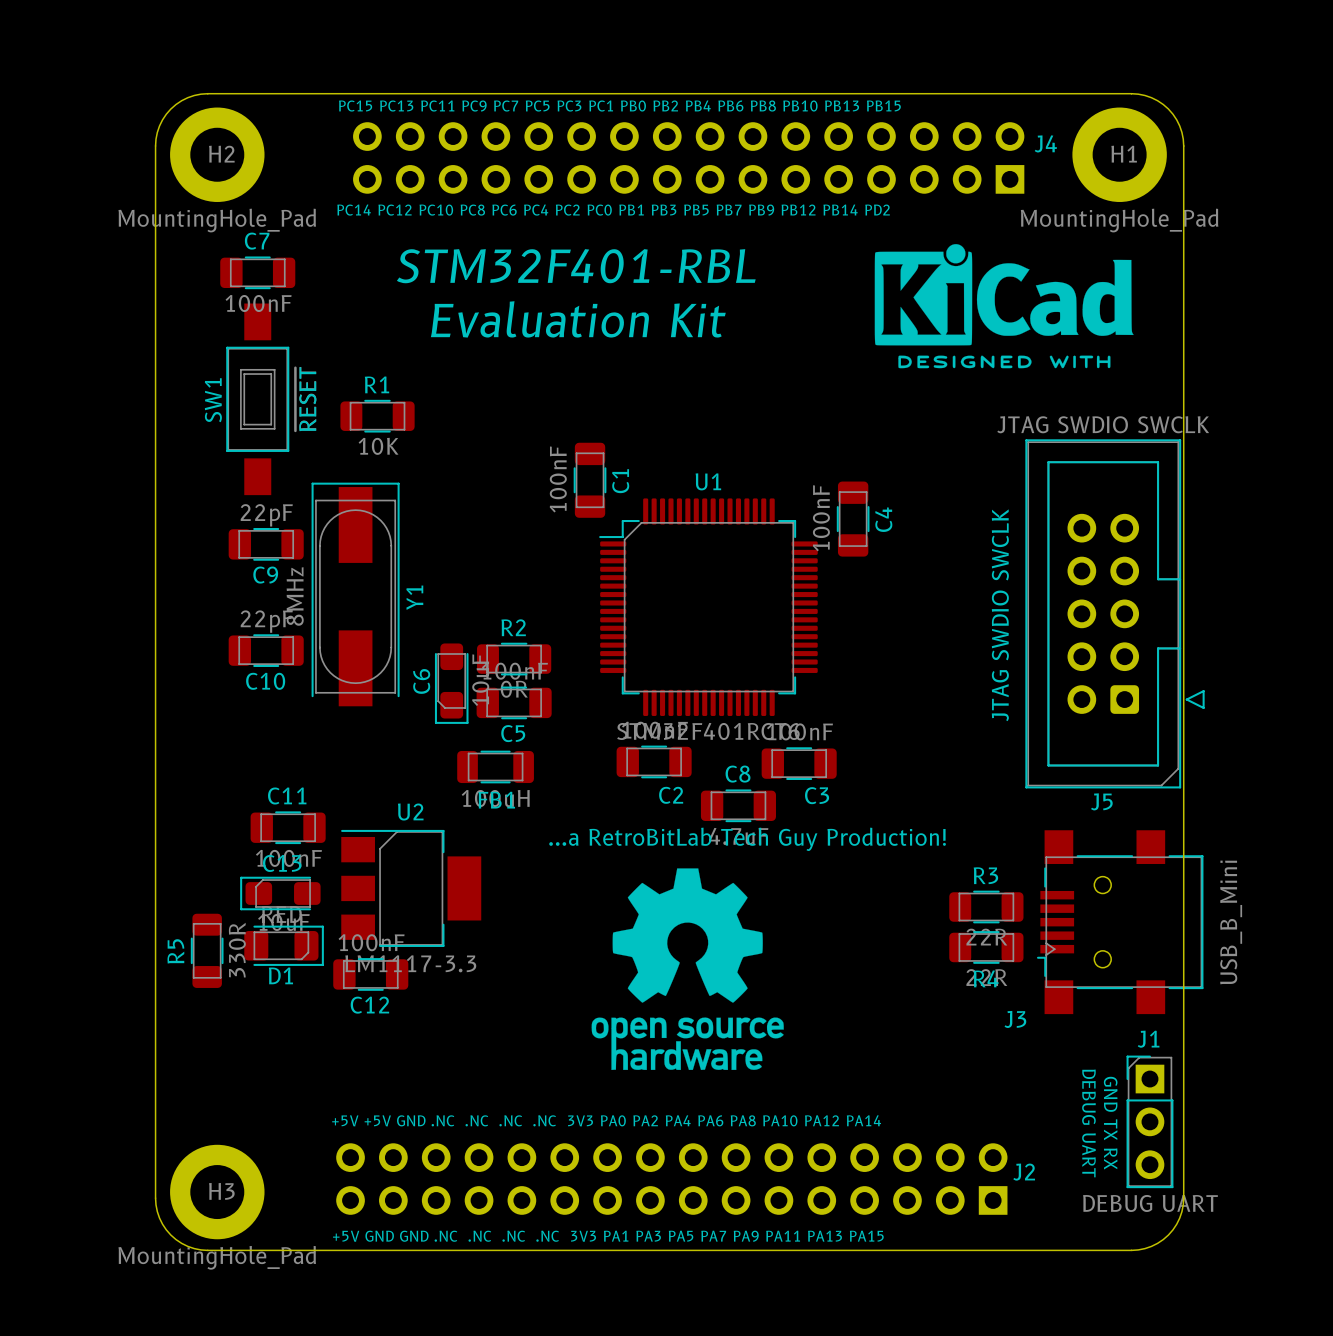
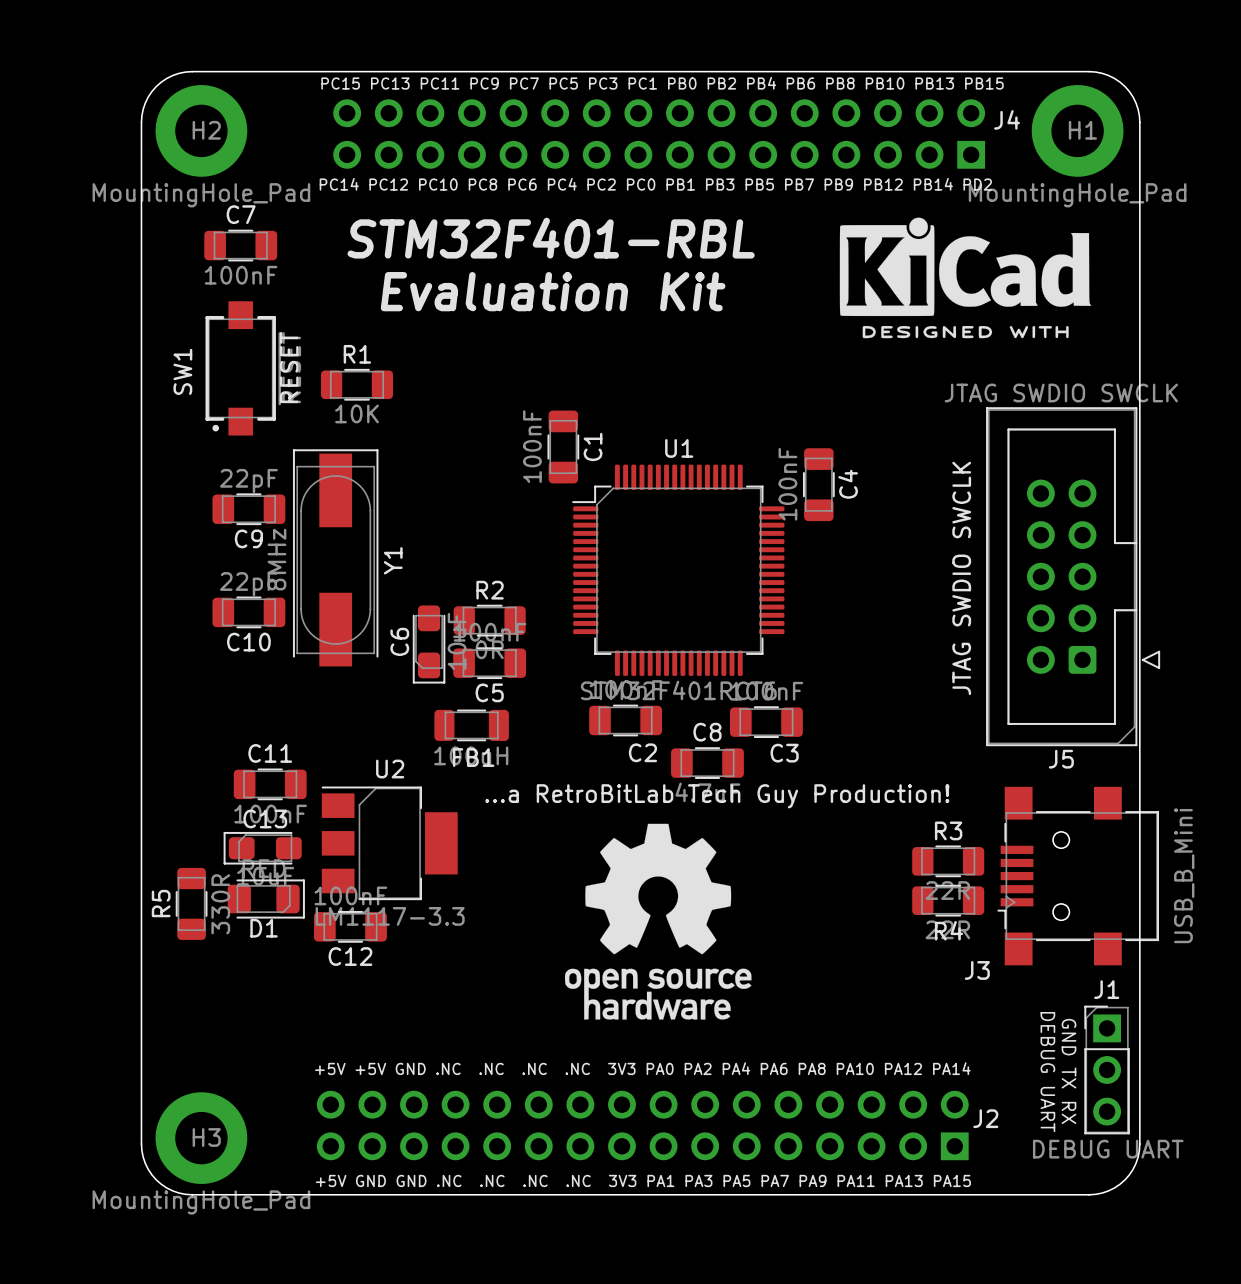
SW1 footprint: [226, 303, 290, 496] -> [205, 301, 276, 436]

